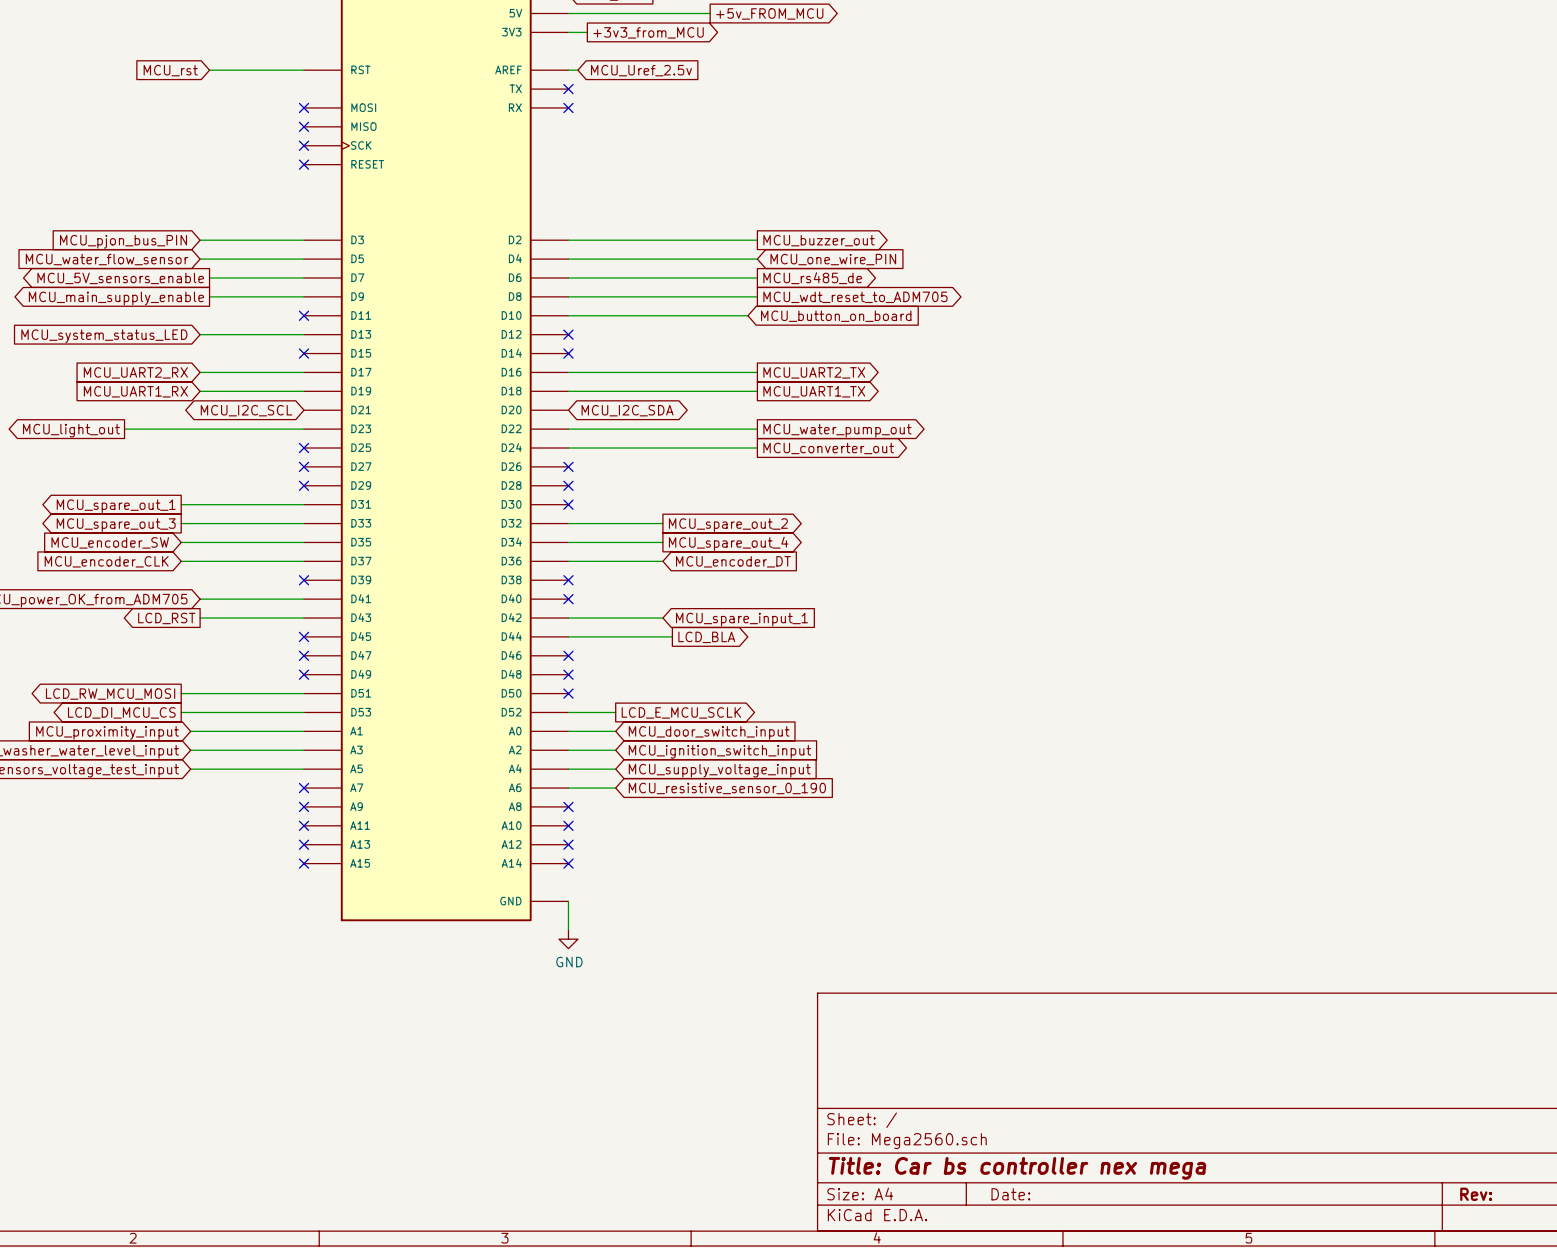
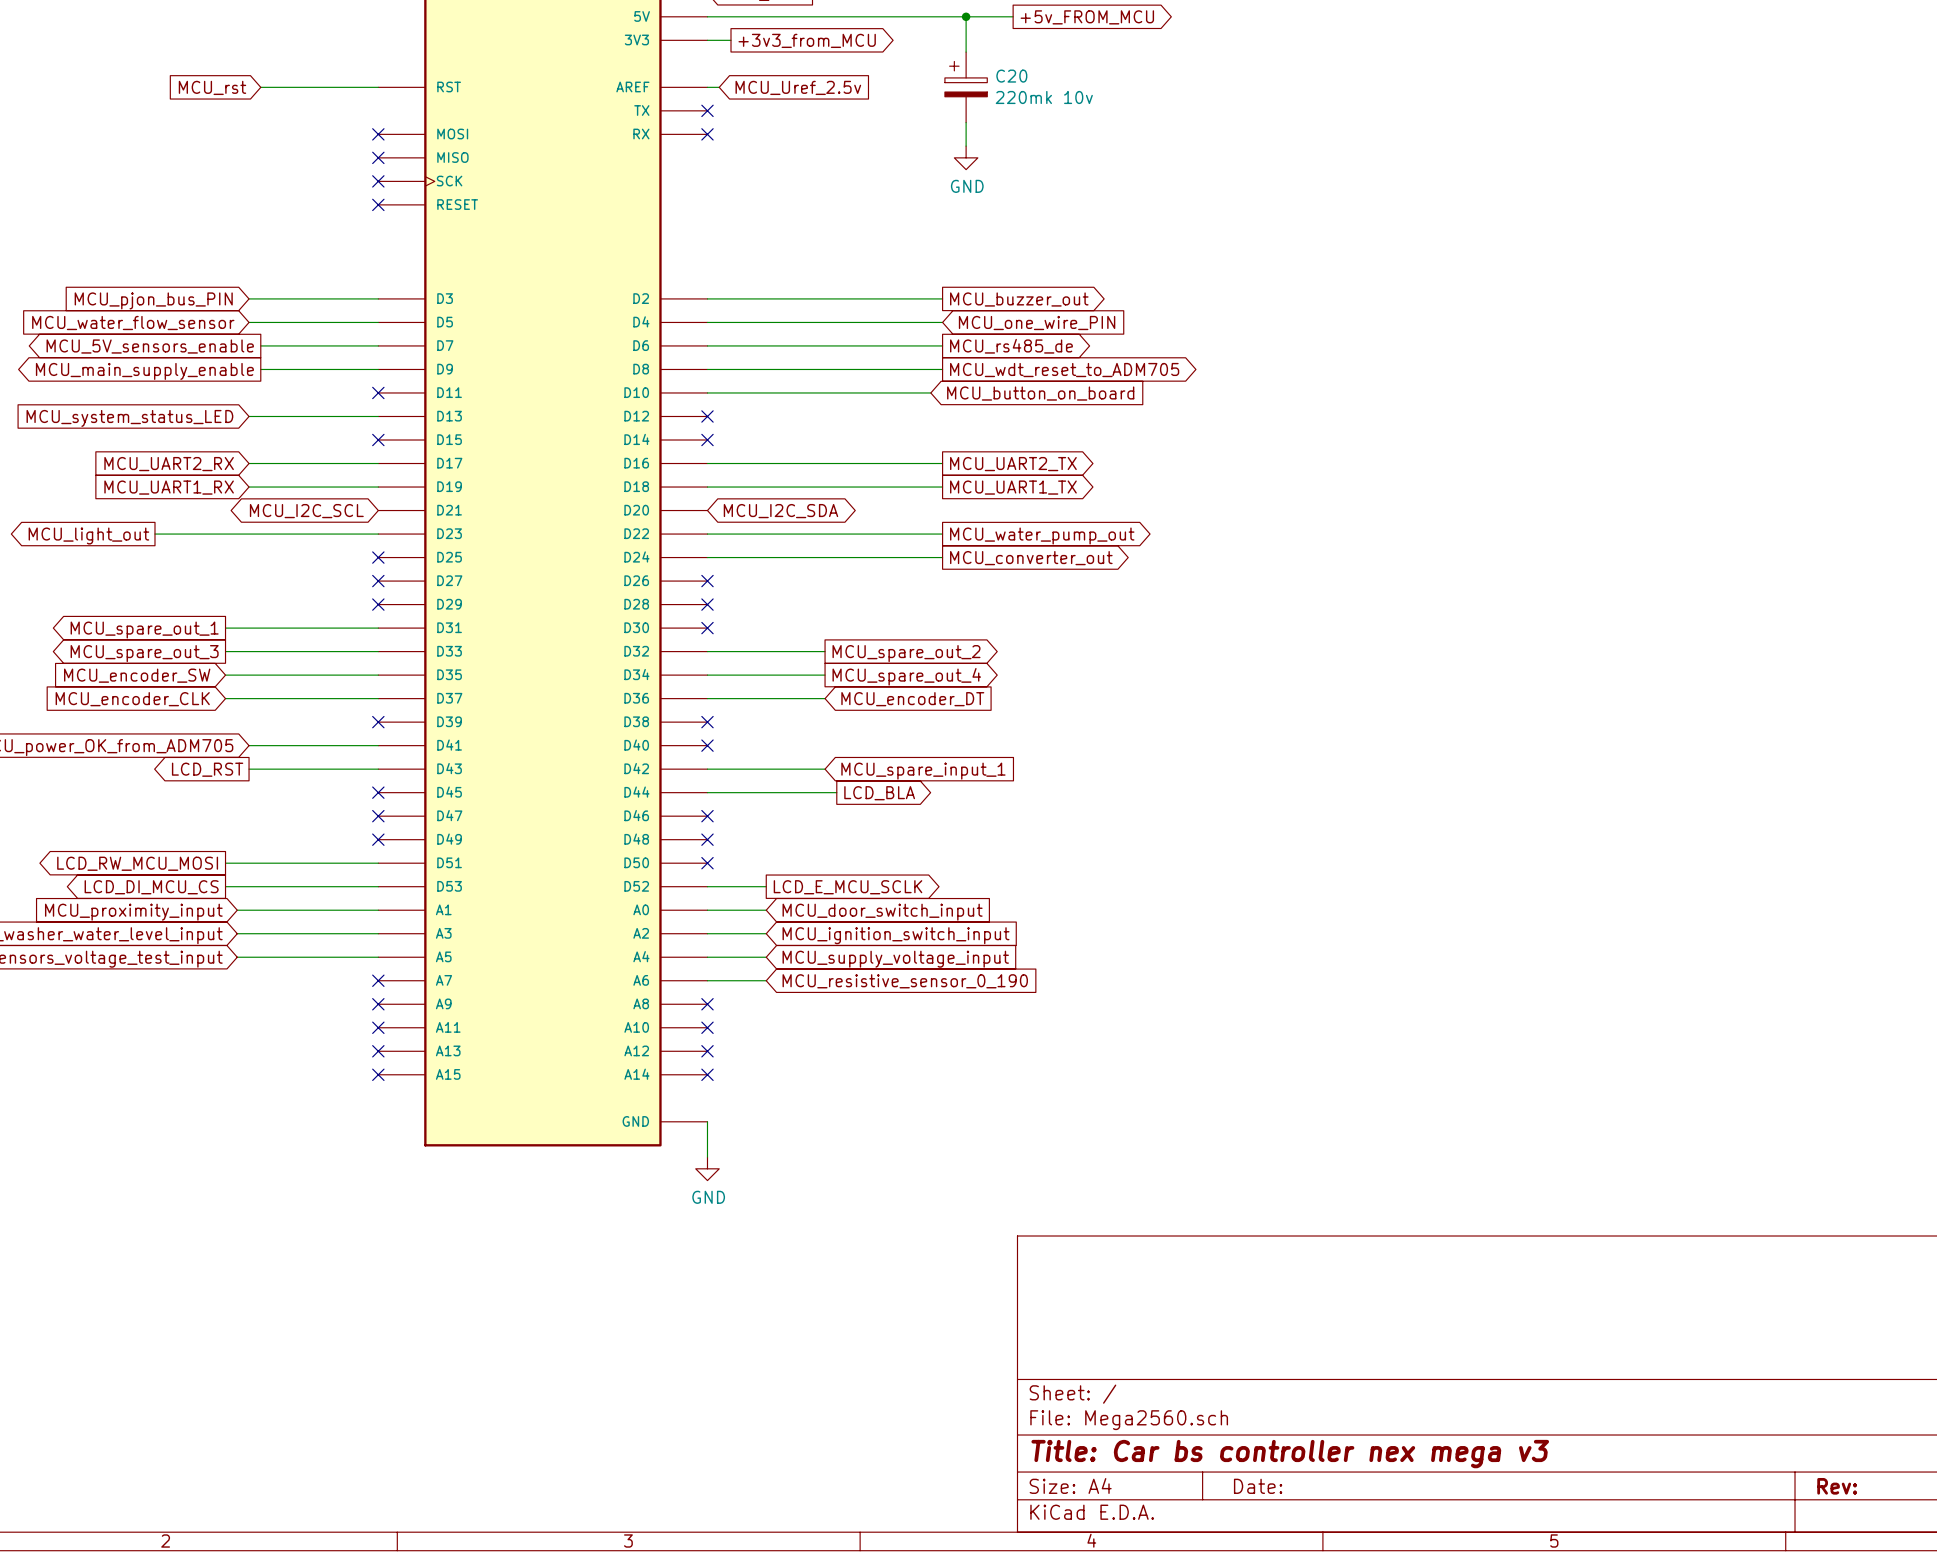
wire: none -> (883, 16) (1013, 16)
global label position: +5v_FROM_MCU (769, 13) -> +5v_FROM_MCU (1087, 17)
wire: none -> (966, 16) (966, 52)
junction: none -> (966, 16)
C20: none -> 220mk 10v (966, 87)
wire: none -> (966, 122) (966, 146)
power symbol: none -> GND (966, 157)
title block: Title: Car bs controller nex mega (1017, 1168) -> Title: Car bs controller nex mega v3 (1290, 1454)

